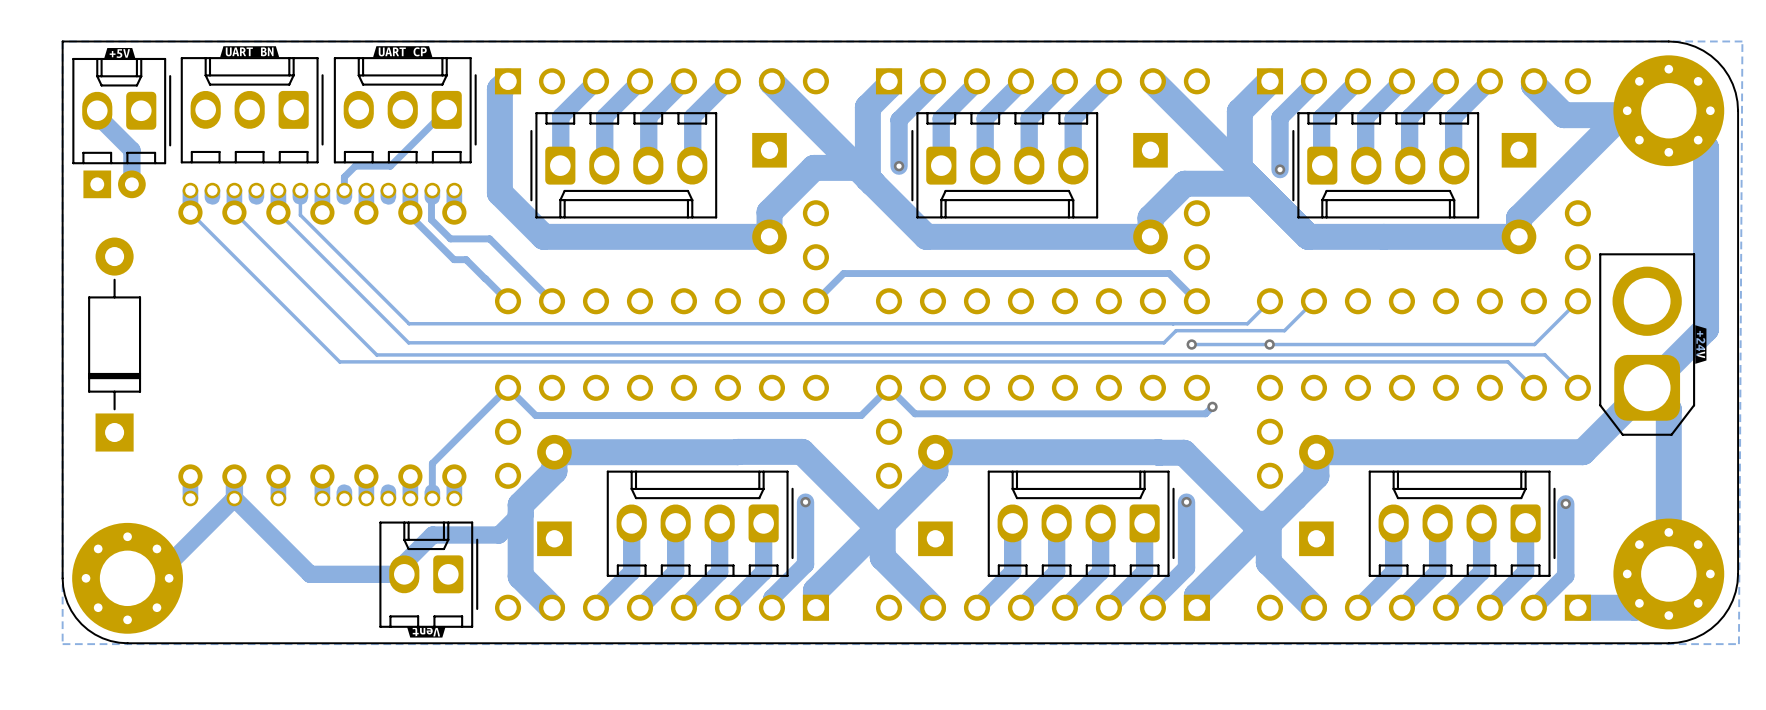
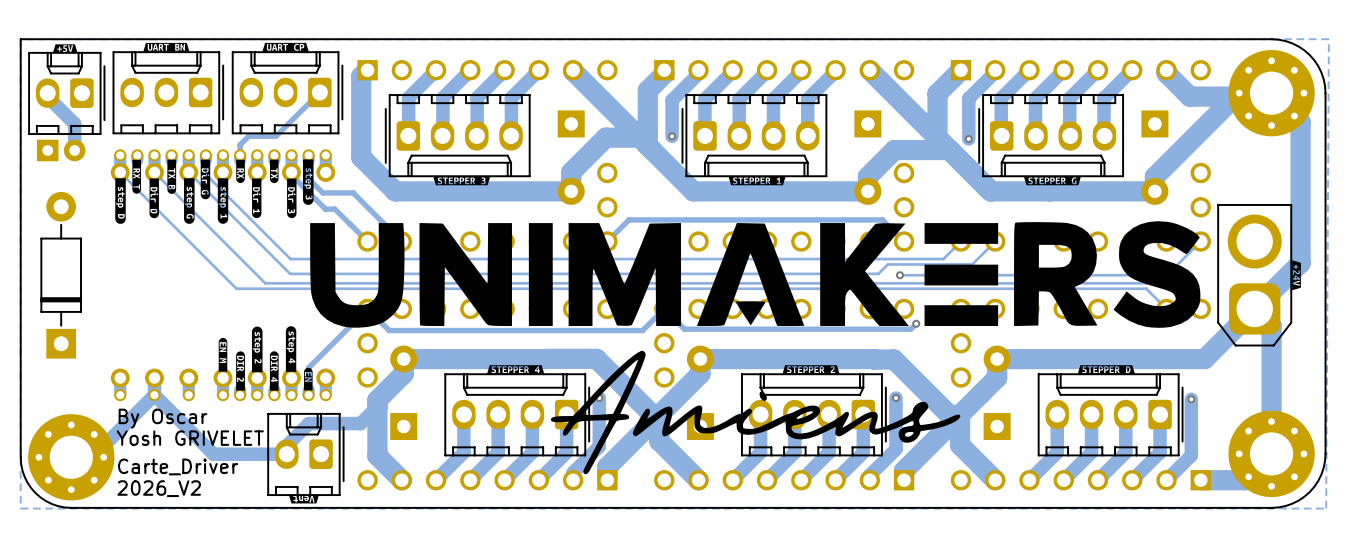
drawing: none -> [115, 159, 1201, 475]
drawing: none -> [433, 176, 491, 186]
drawing: none -> [728, 176, 786, 186]
drawing: none -> [1023, 176, 1081, 186]
text: none -> By Oscar (163, 418)
text: none -> Yosh GRIVELET (190, 438)
text: none -> Carte_Driver (178, 466)
text: none -> 2026_V2 (159, 488)

